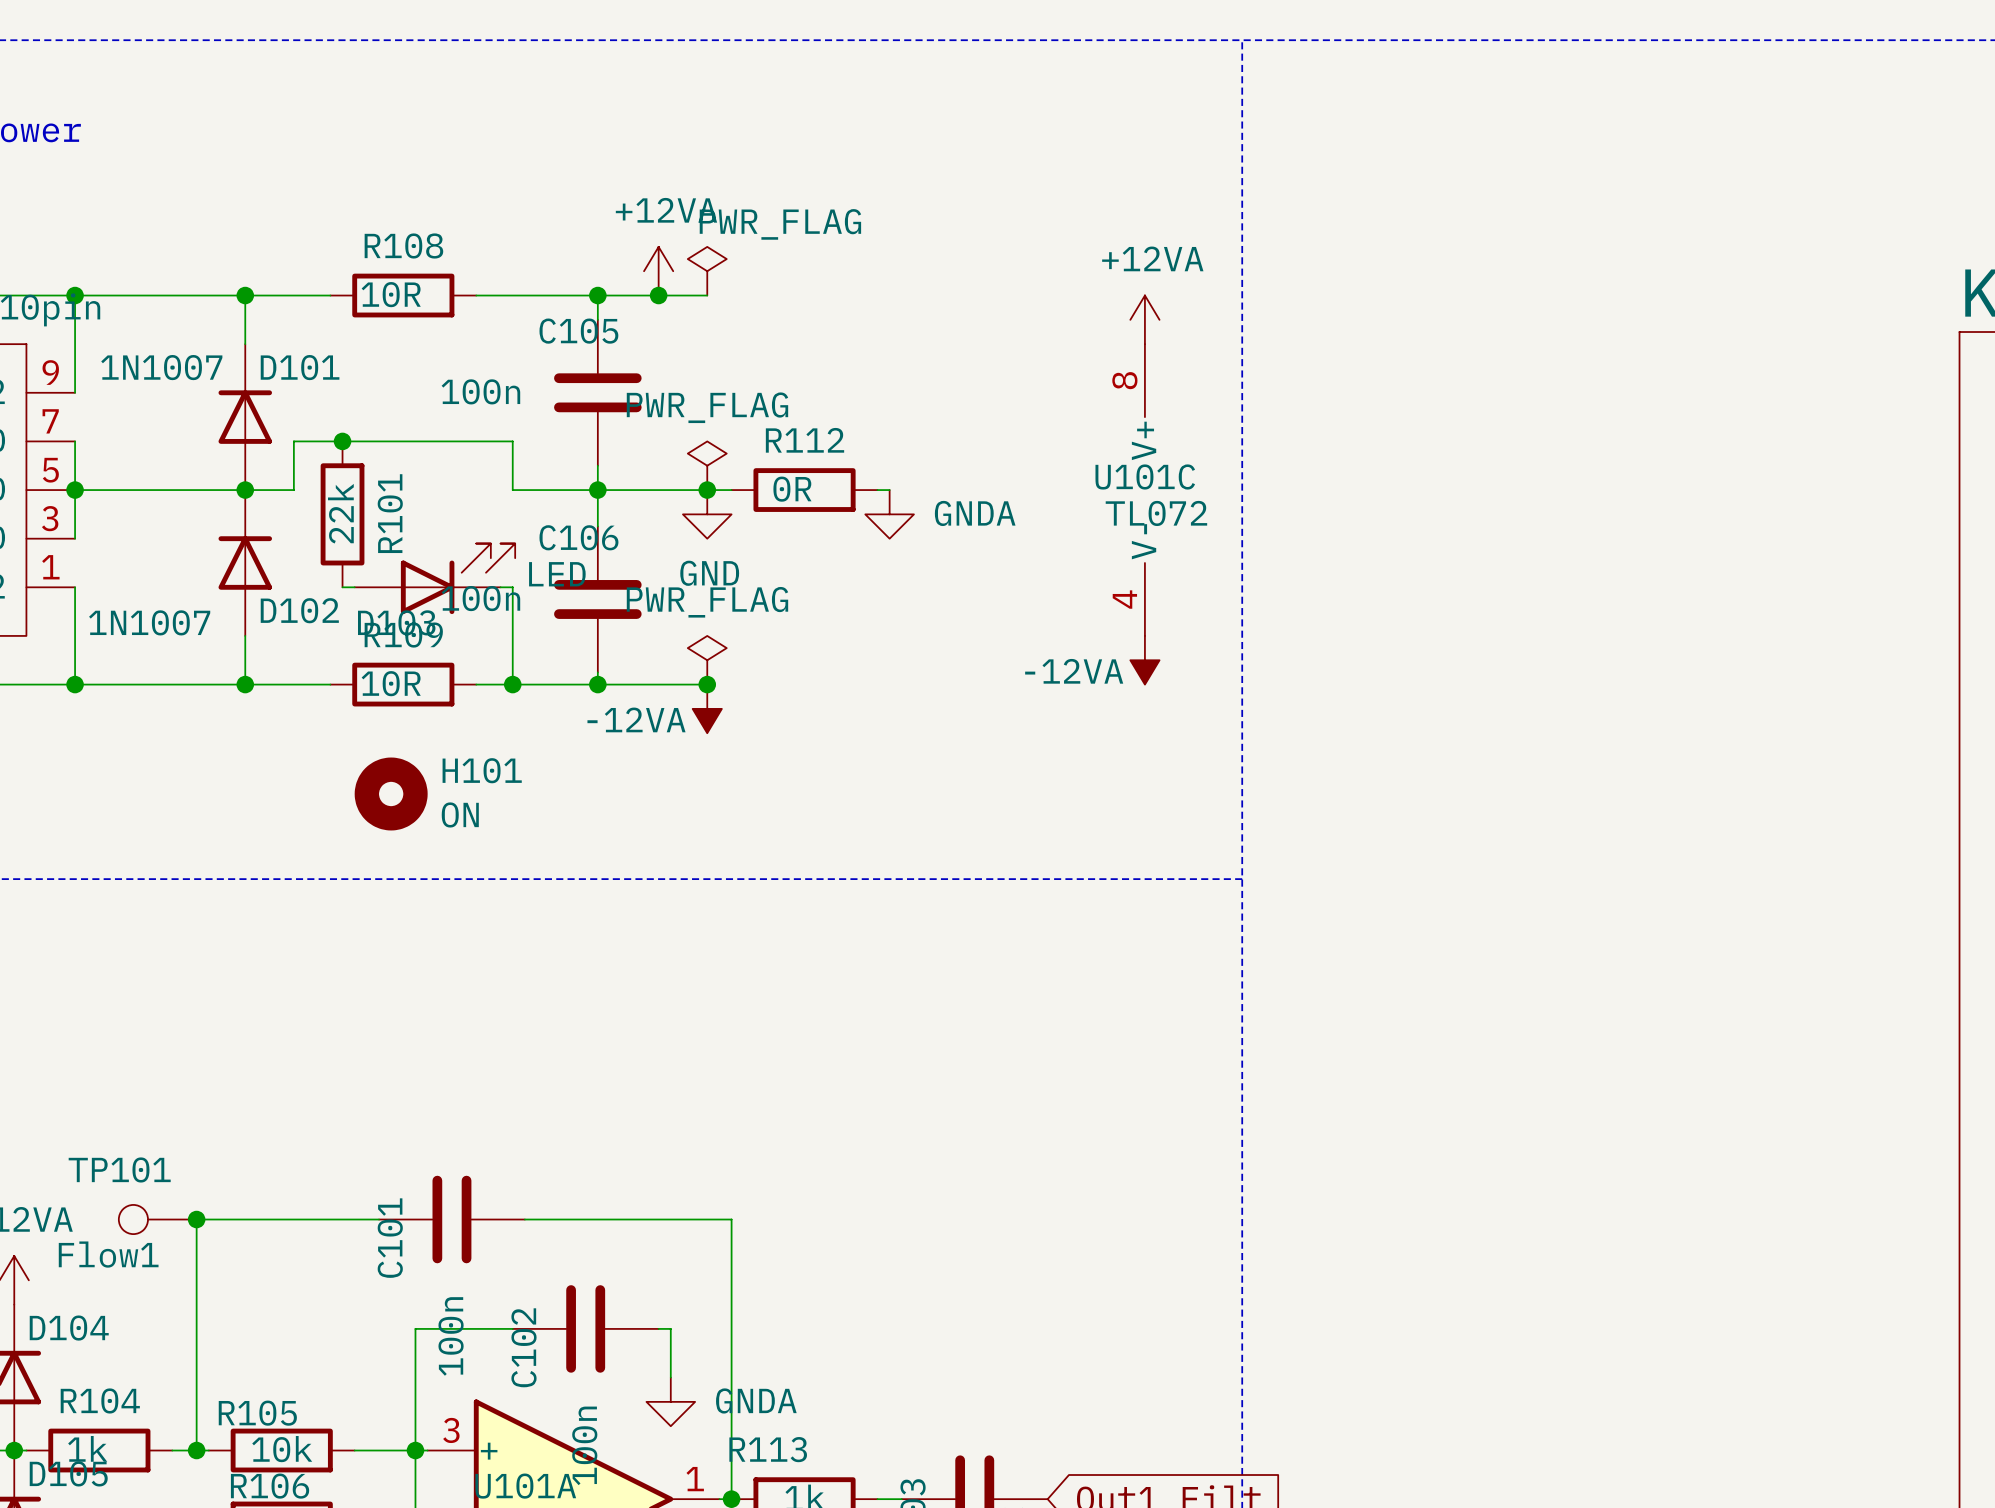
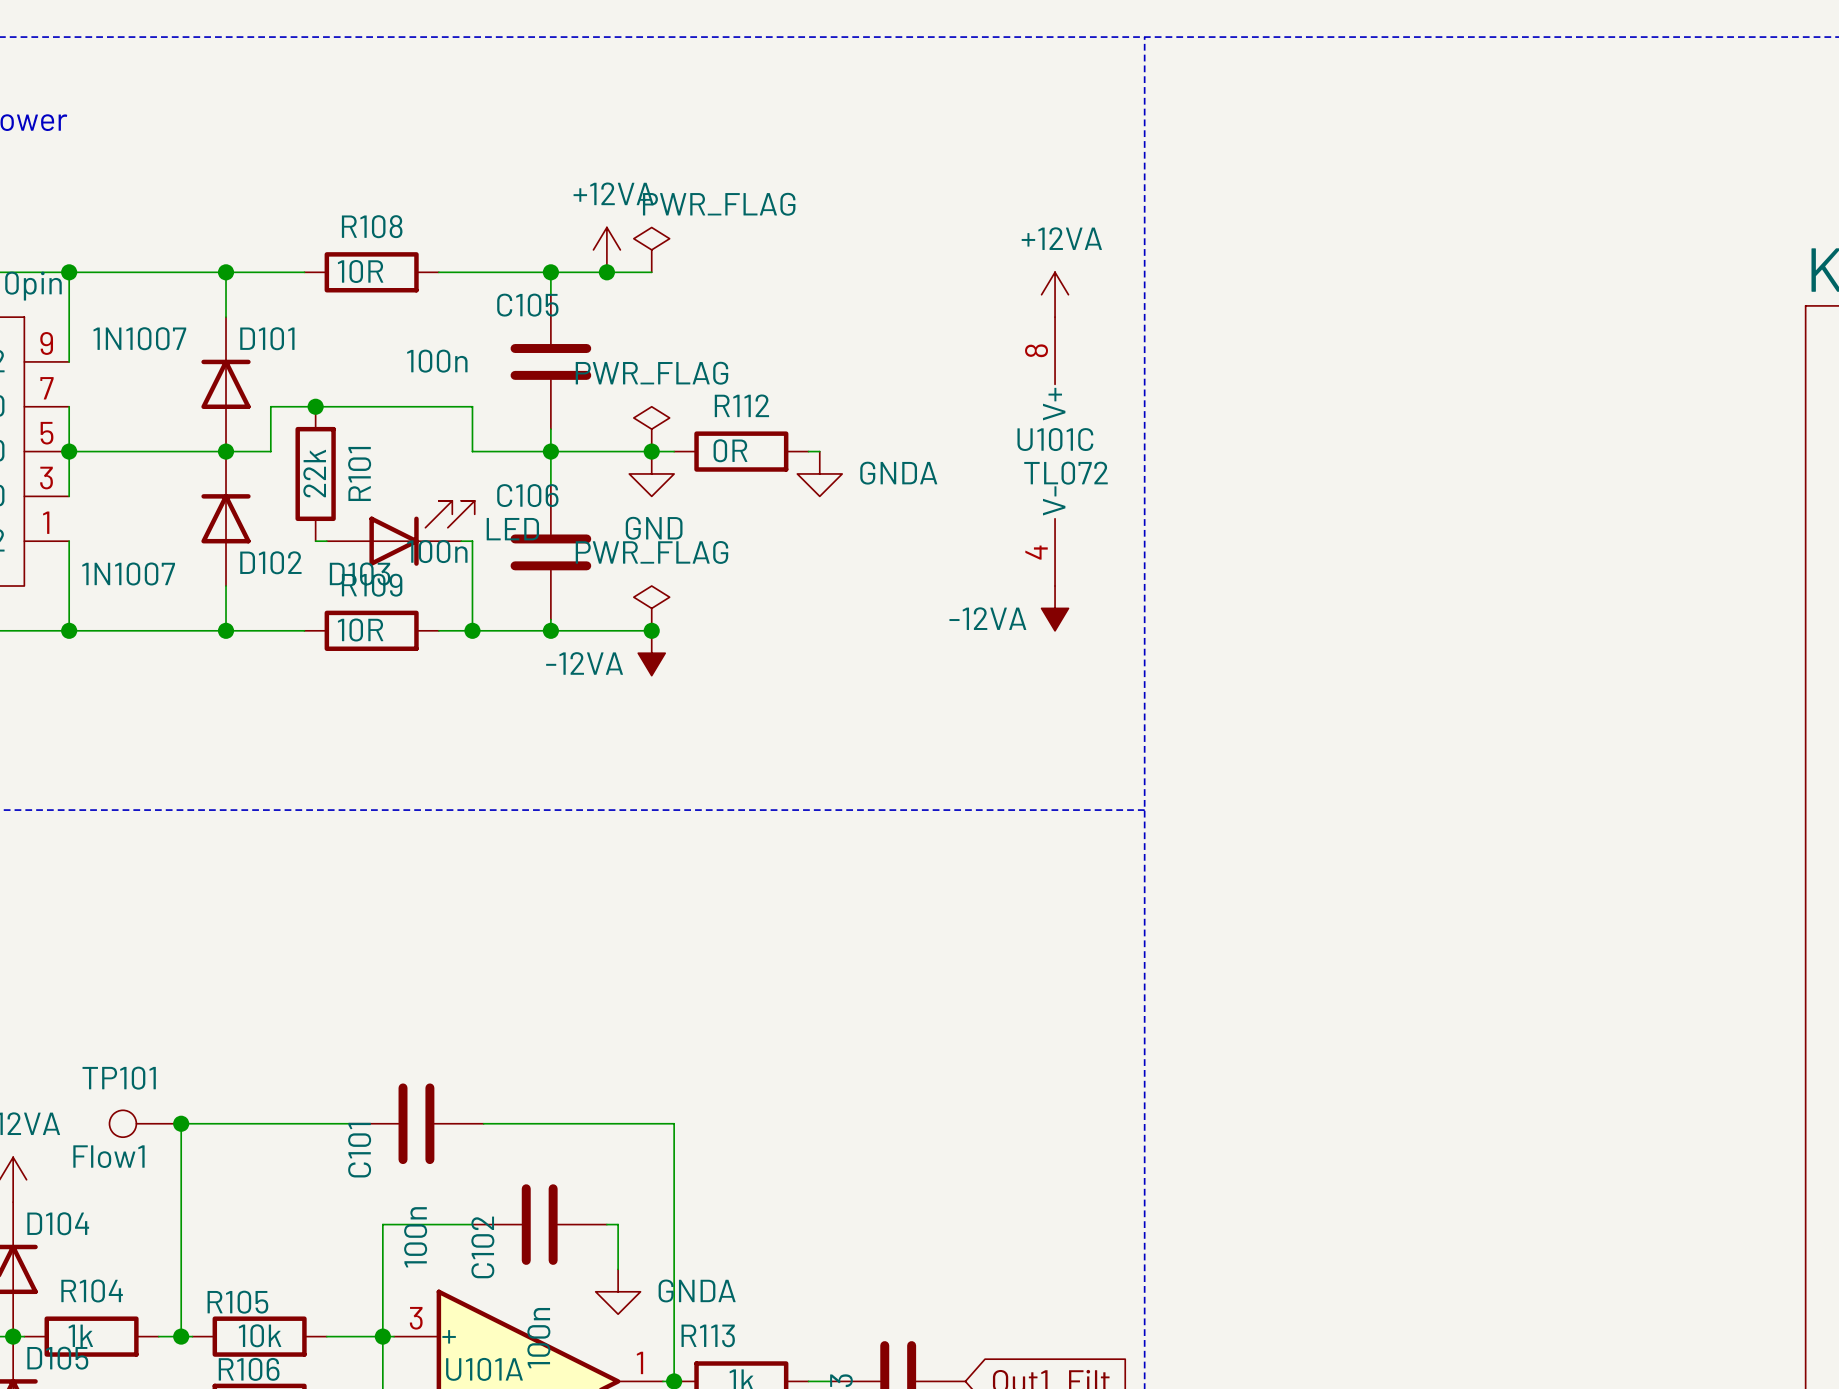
H101: ON (391, 794) -> none

